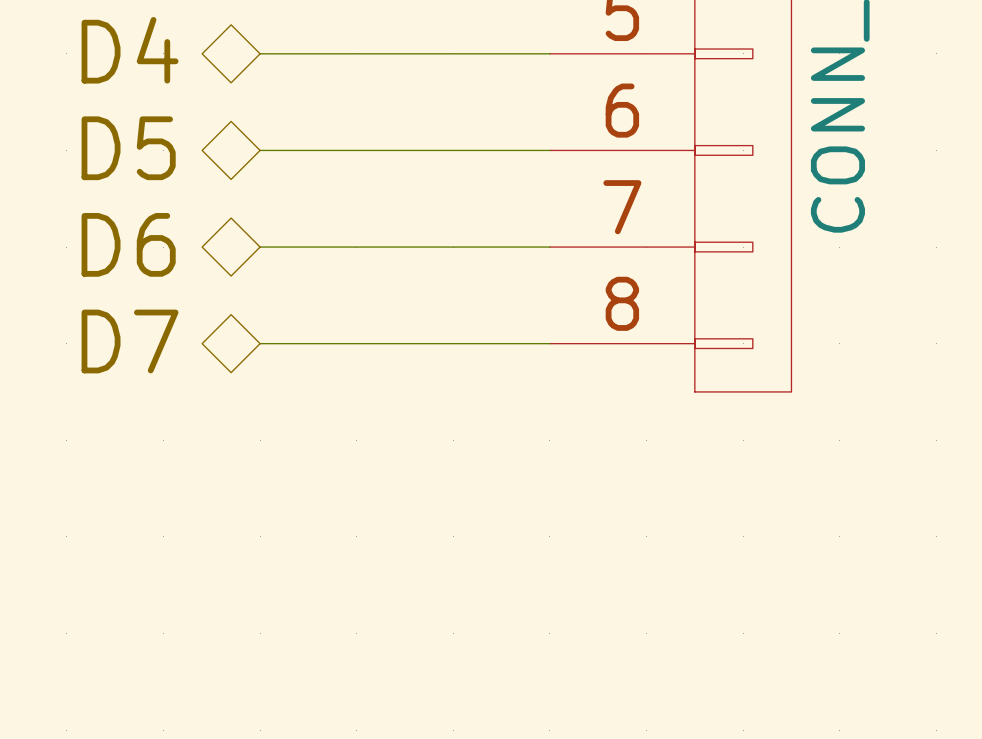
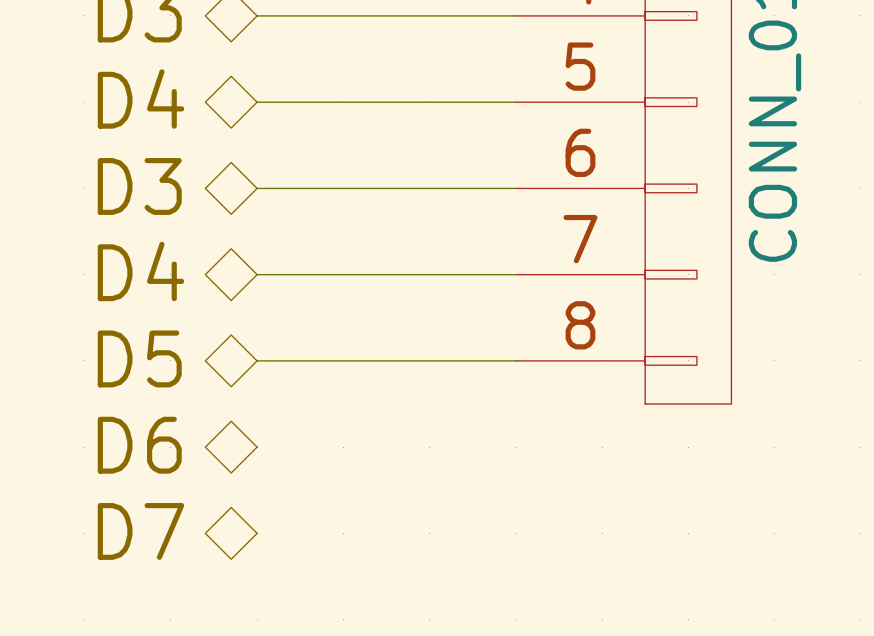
hierarchical label: D5 (128, 148) -> D3 (139, 186)
hierarchical label: D6 (128, 244) -> D4 (140, 271)
hierarchical label: D7 (130, 341) -> D5 (139, 358)
hierarchical label: none -> D6 (139, 445)
hierarchical label: none -> D7 (140, 531)

